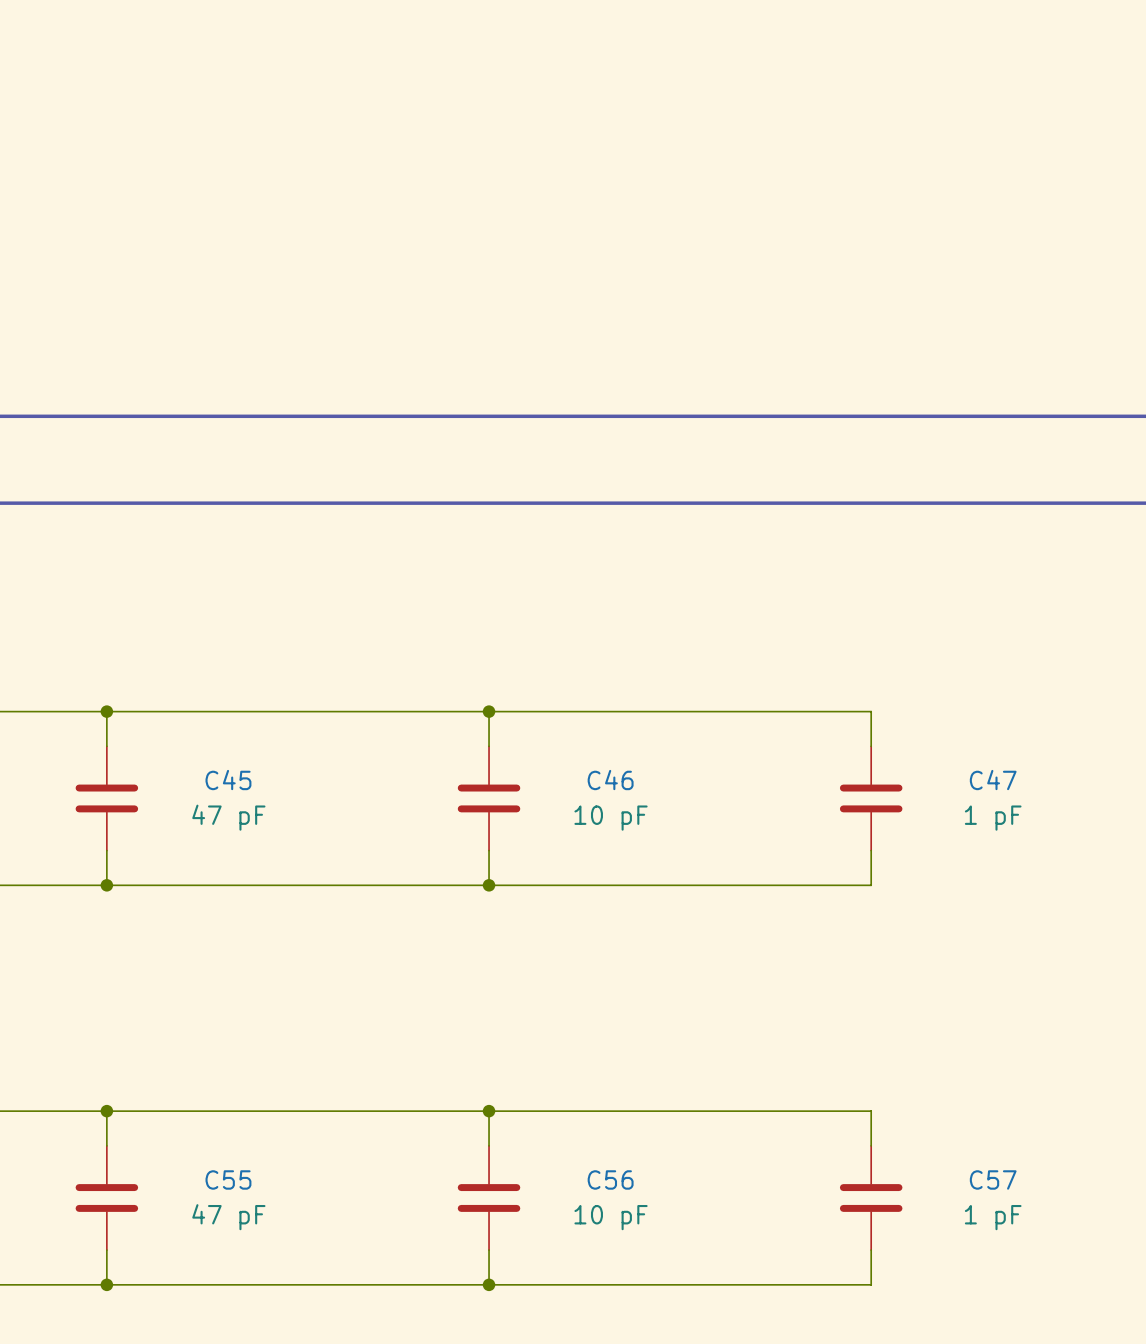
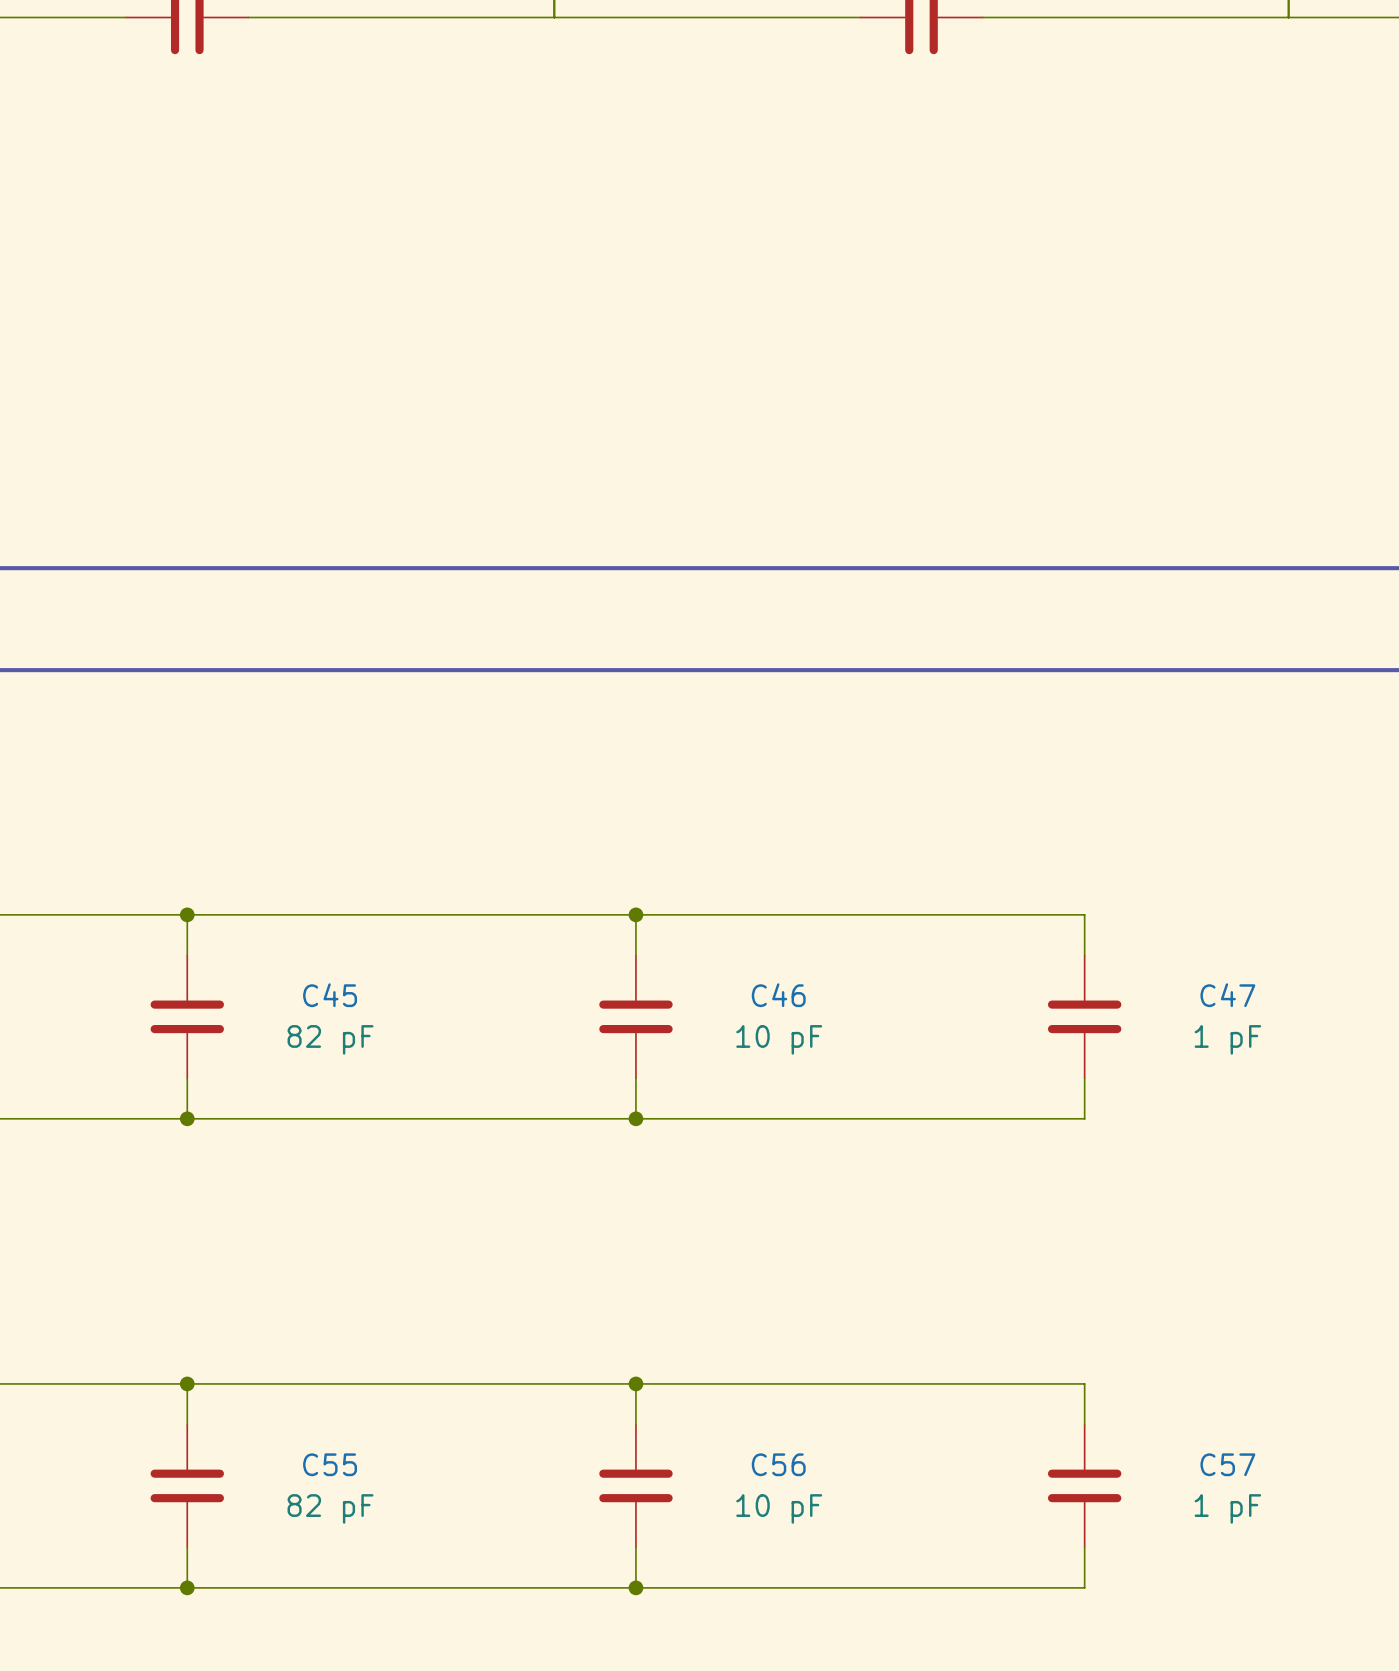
C45 value: 47 pF (228, 817) -> 82 pF (330, 1039)
C55 value: 47 pF (228, 1217) -> 82 pF (330, 1508)

